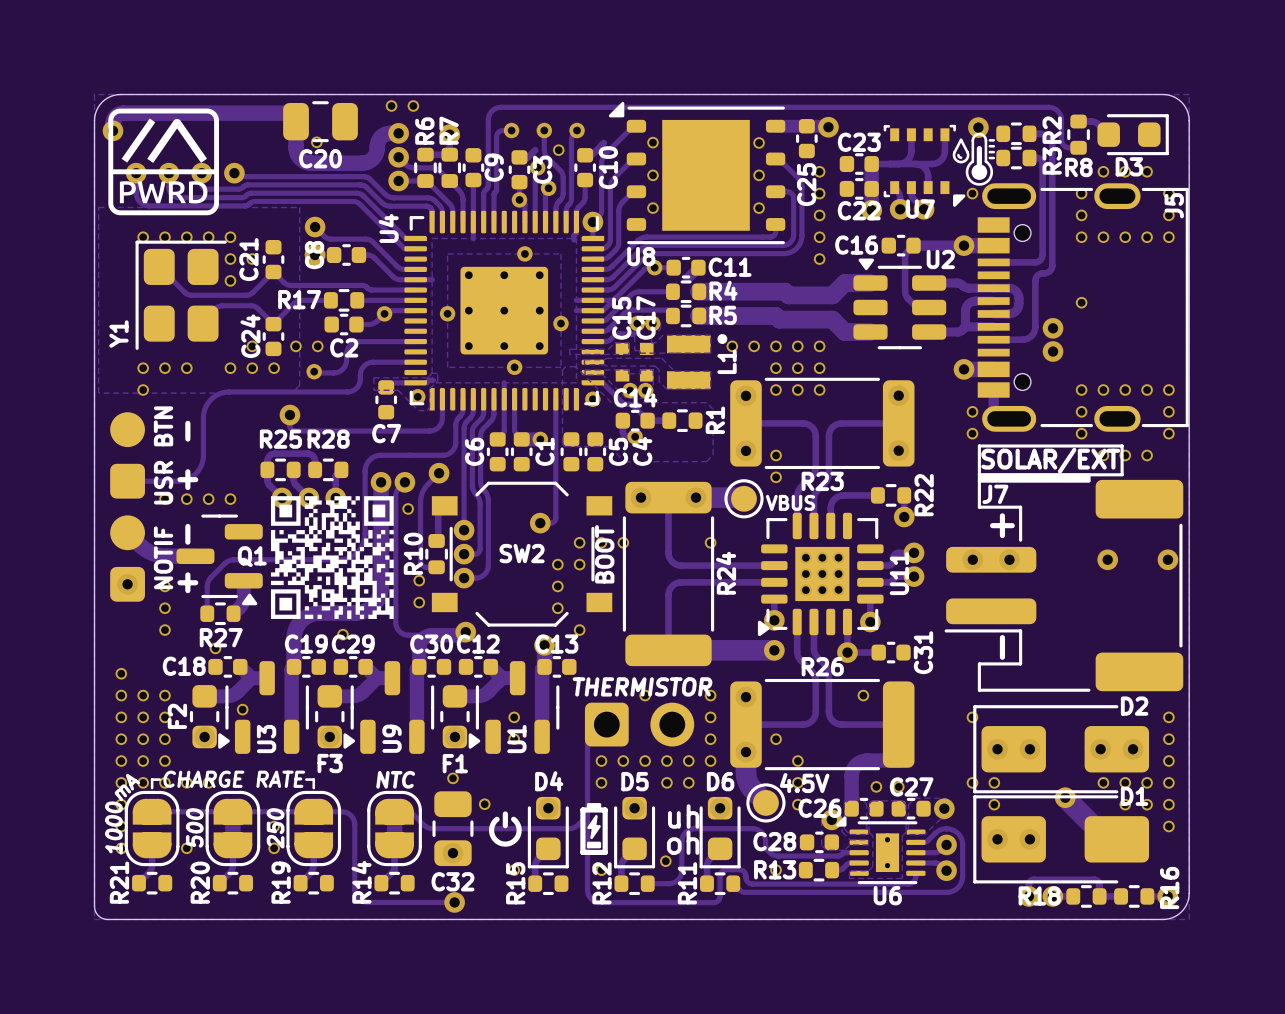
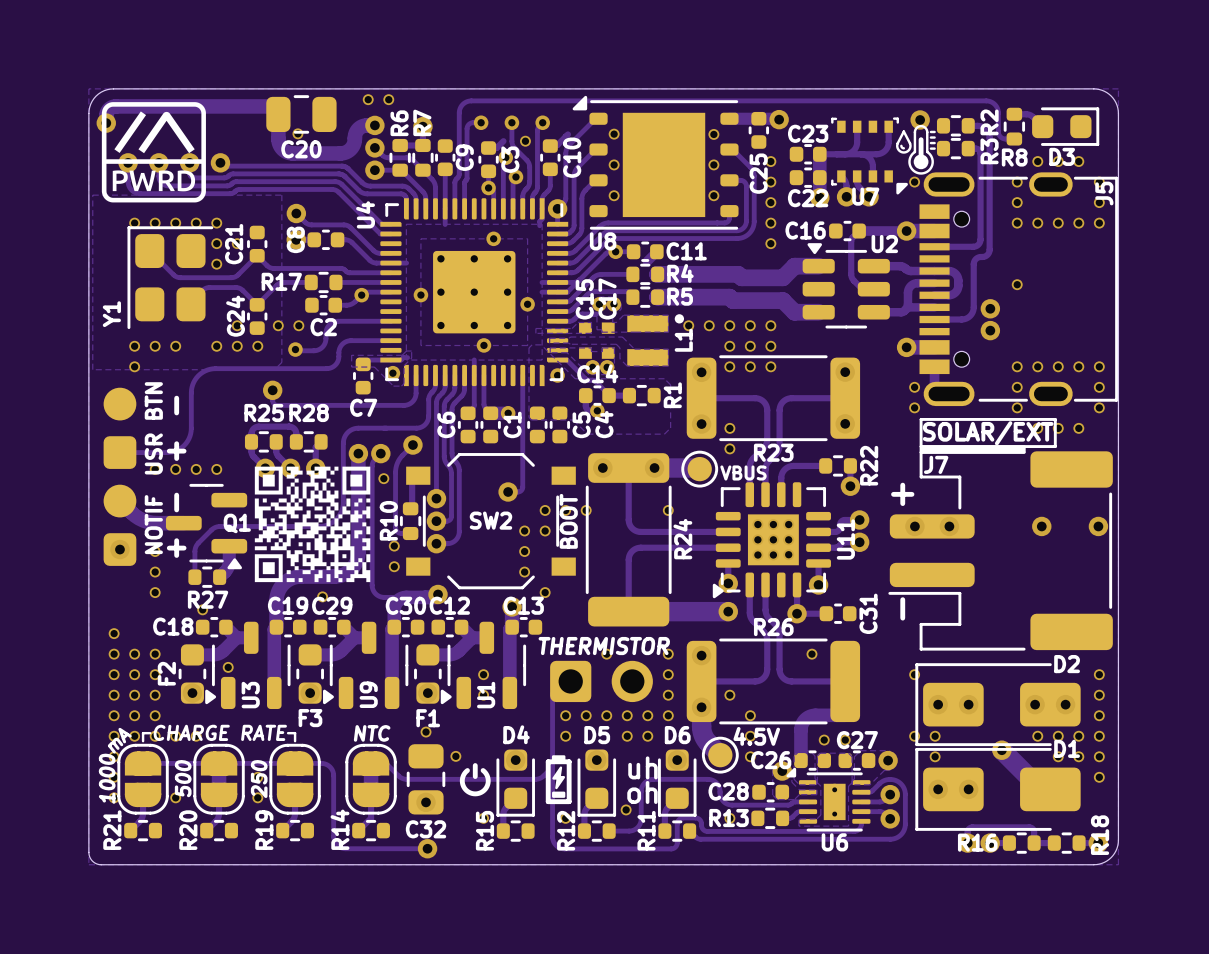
text position: + (1002, 525) -> + (902, 494)
text position: - (1002, 647) -> - (902, 608)
R16 name rotation: 0° (1169, 888) -> 90° clockwise (977, 842)
R16 name position: R16 (1169, 888) -> R16 (977, 842)
R18 name rotation: 0° (1039, 895) -> 90° counterclockwise (1100, 835)
R18 name position: R18 (1039, 895) -> R18 (1100, 835)

